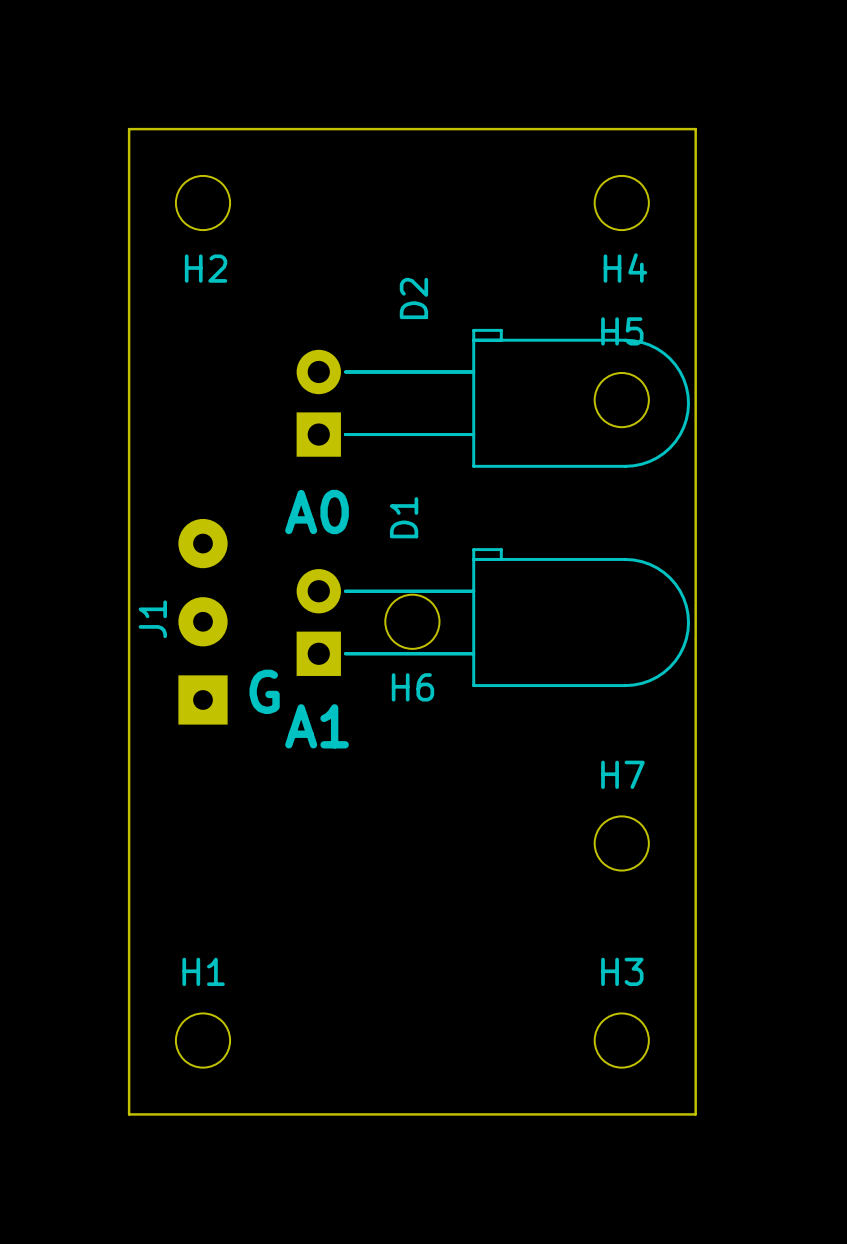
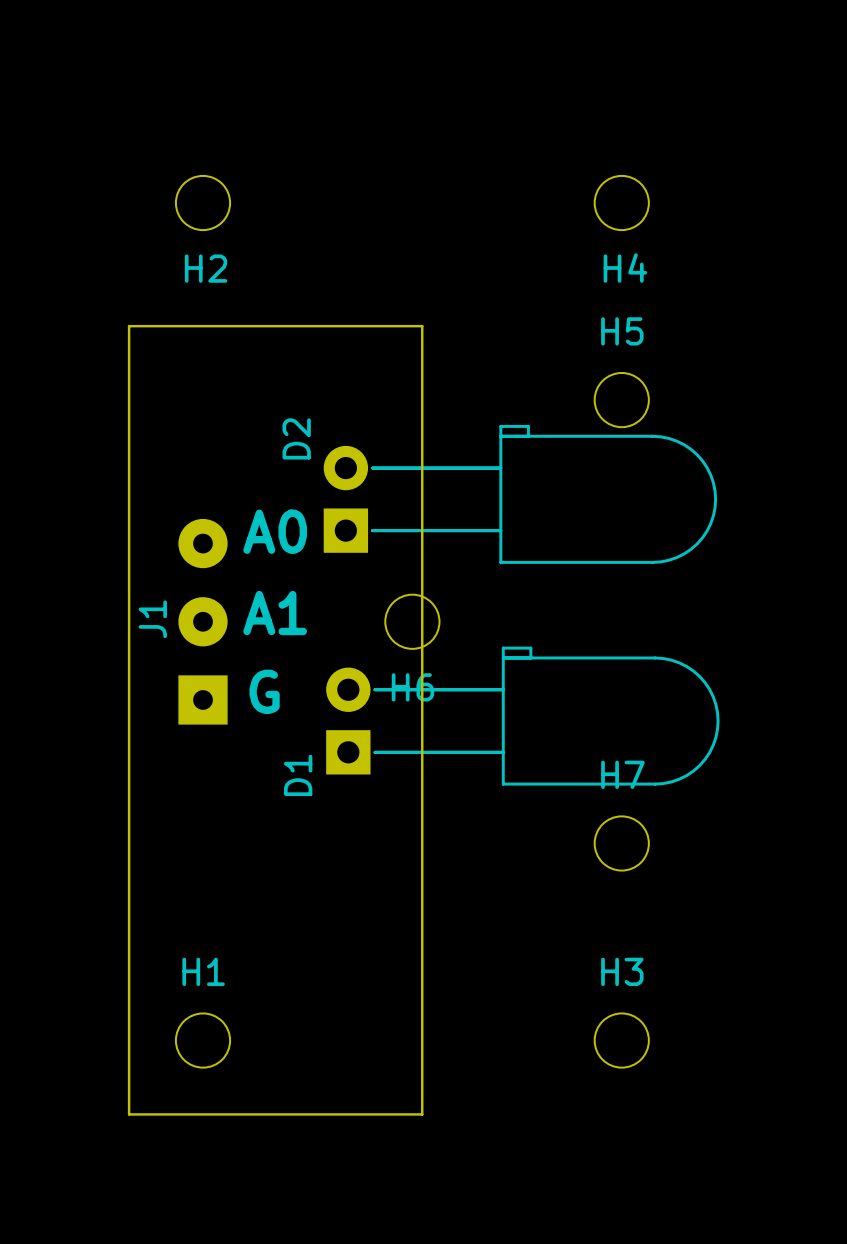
D2 name position: D2 (413, 298) -> D2 (296, 438)
board edge: (129, 326) (129, 129) (695, 129) (695, 1114) (422, 1114) -> (129, 326) (422, 326) (422, 1114)
D2 position: (493, 398) -> (520, 494)
text position: A0 (317, 512) -> A0 (275, 531)
D1 name position: D1 (404, 517) -> D1 (298, 775)
D1 position: (493, 617) -> (522, 716)
text position: A1 (317, 726) -> A1 (275, 613)

